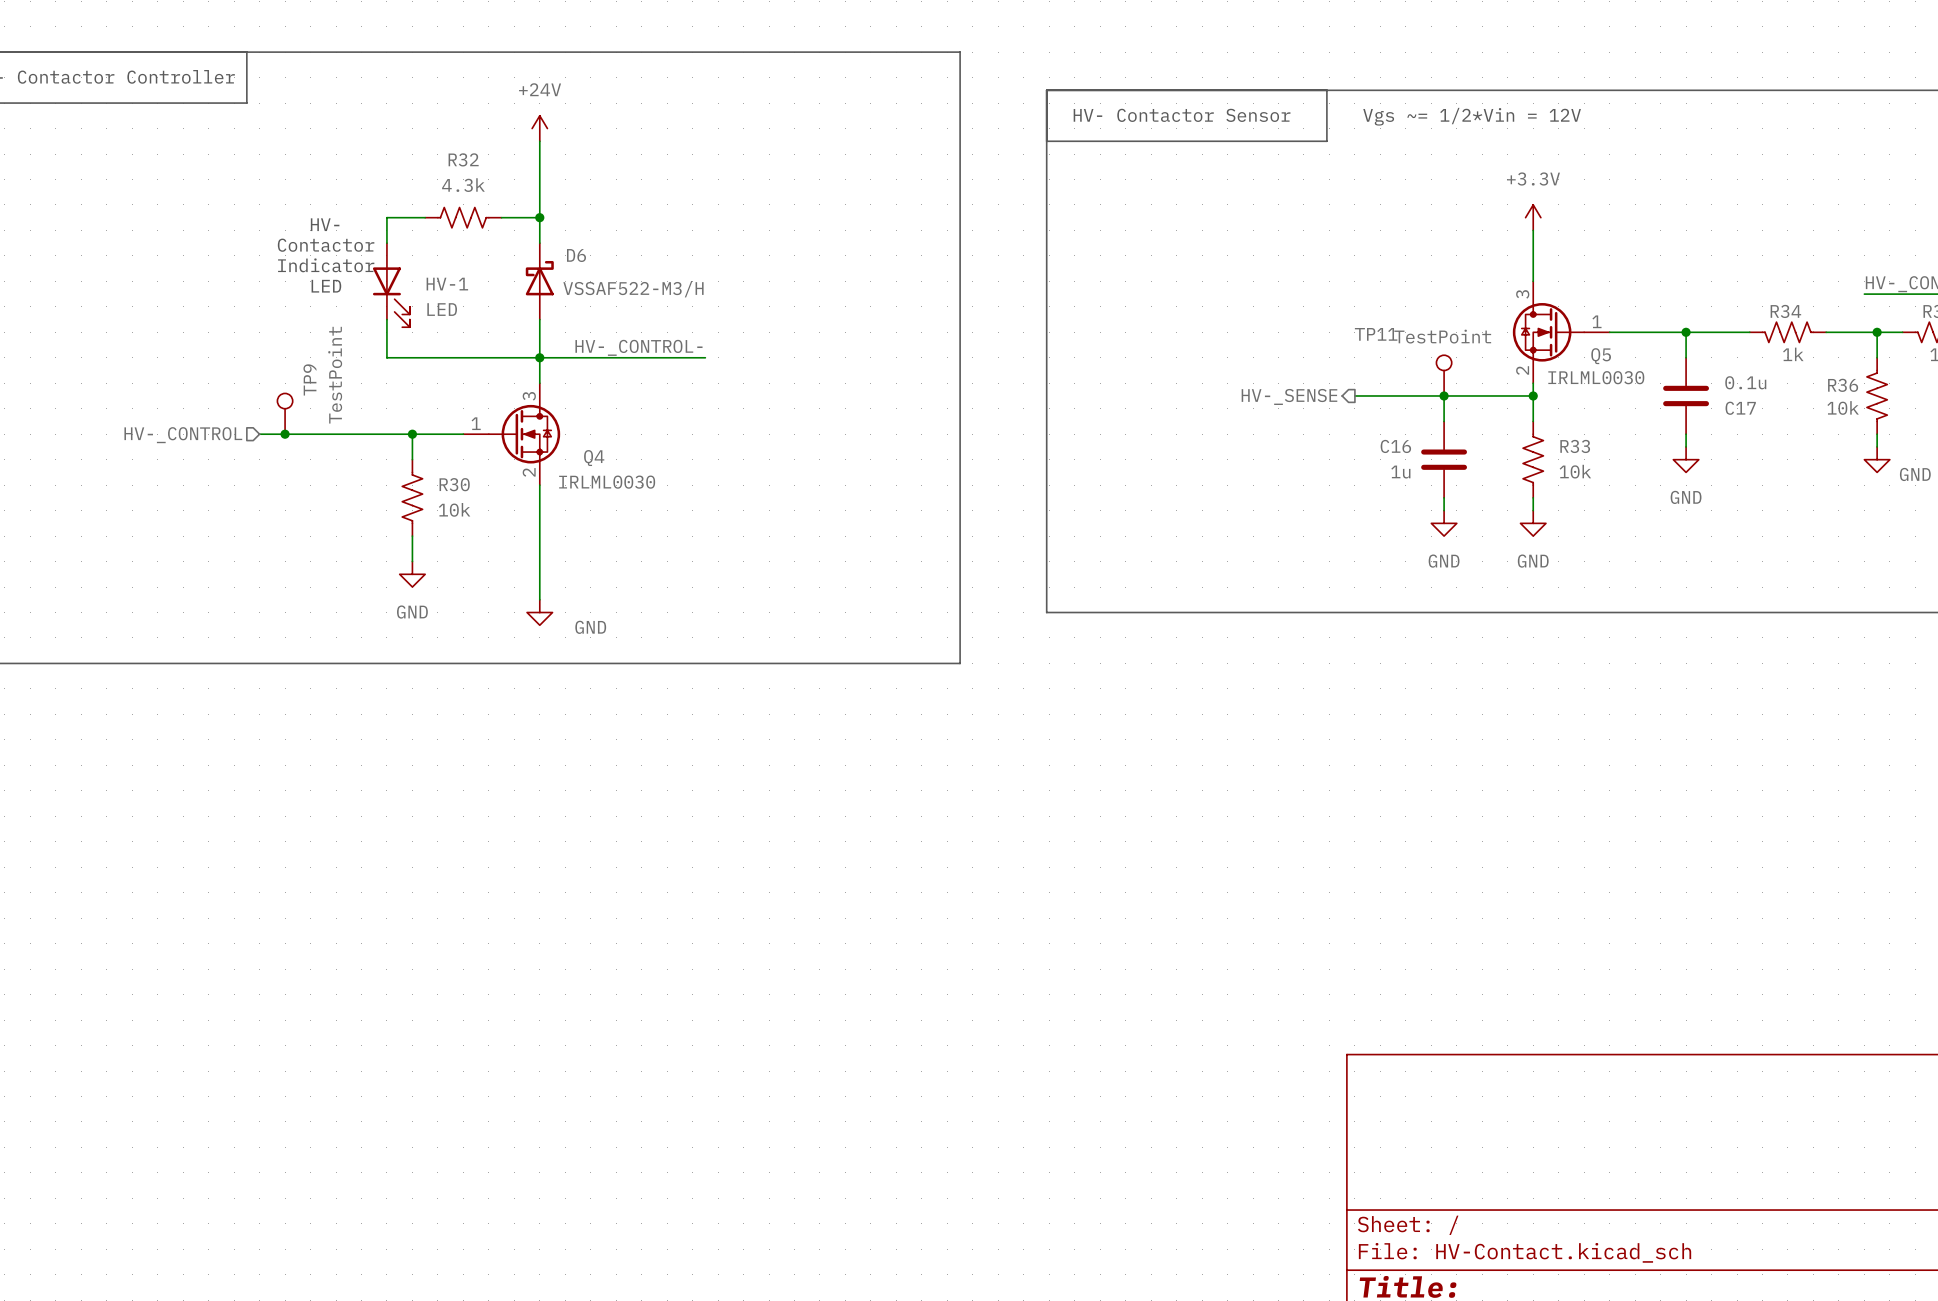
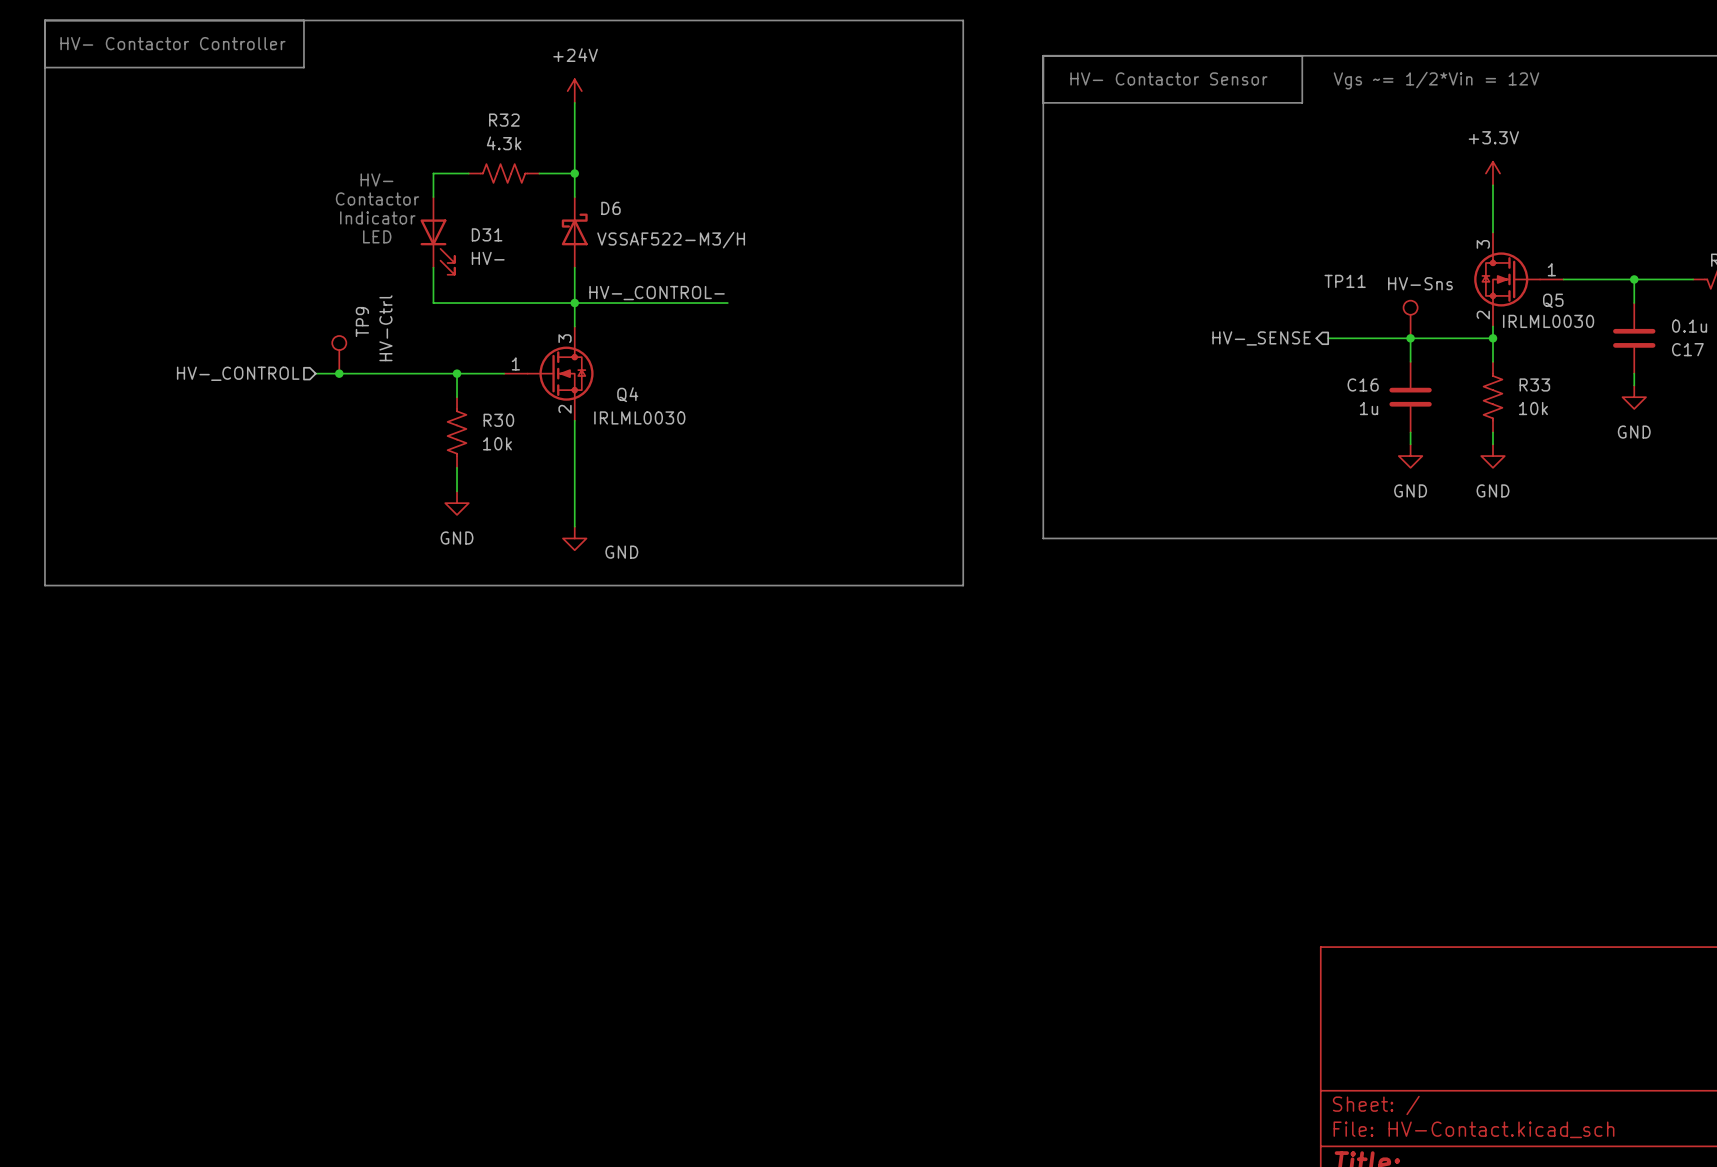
HV-1 name: HV-1 (447, 284) -> D31 (487, 234)
HV-1 value: LED (442, 309) -> HV- (488, 258)
TP11 value: TestPoint (1442, 336) -> HV-Sns (1420, 283)
TP9 value: TestPoint (335, 375) -> HV-Ctrl (385, 328)

